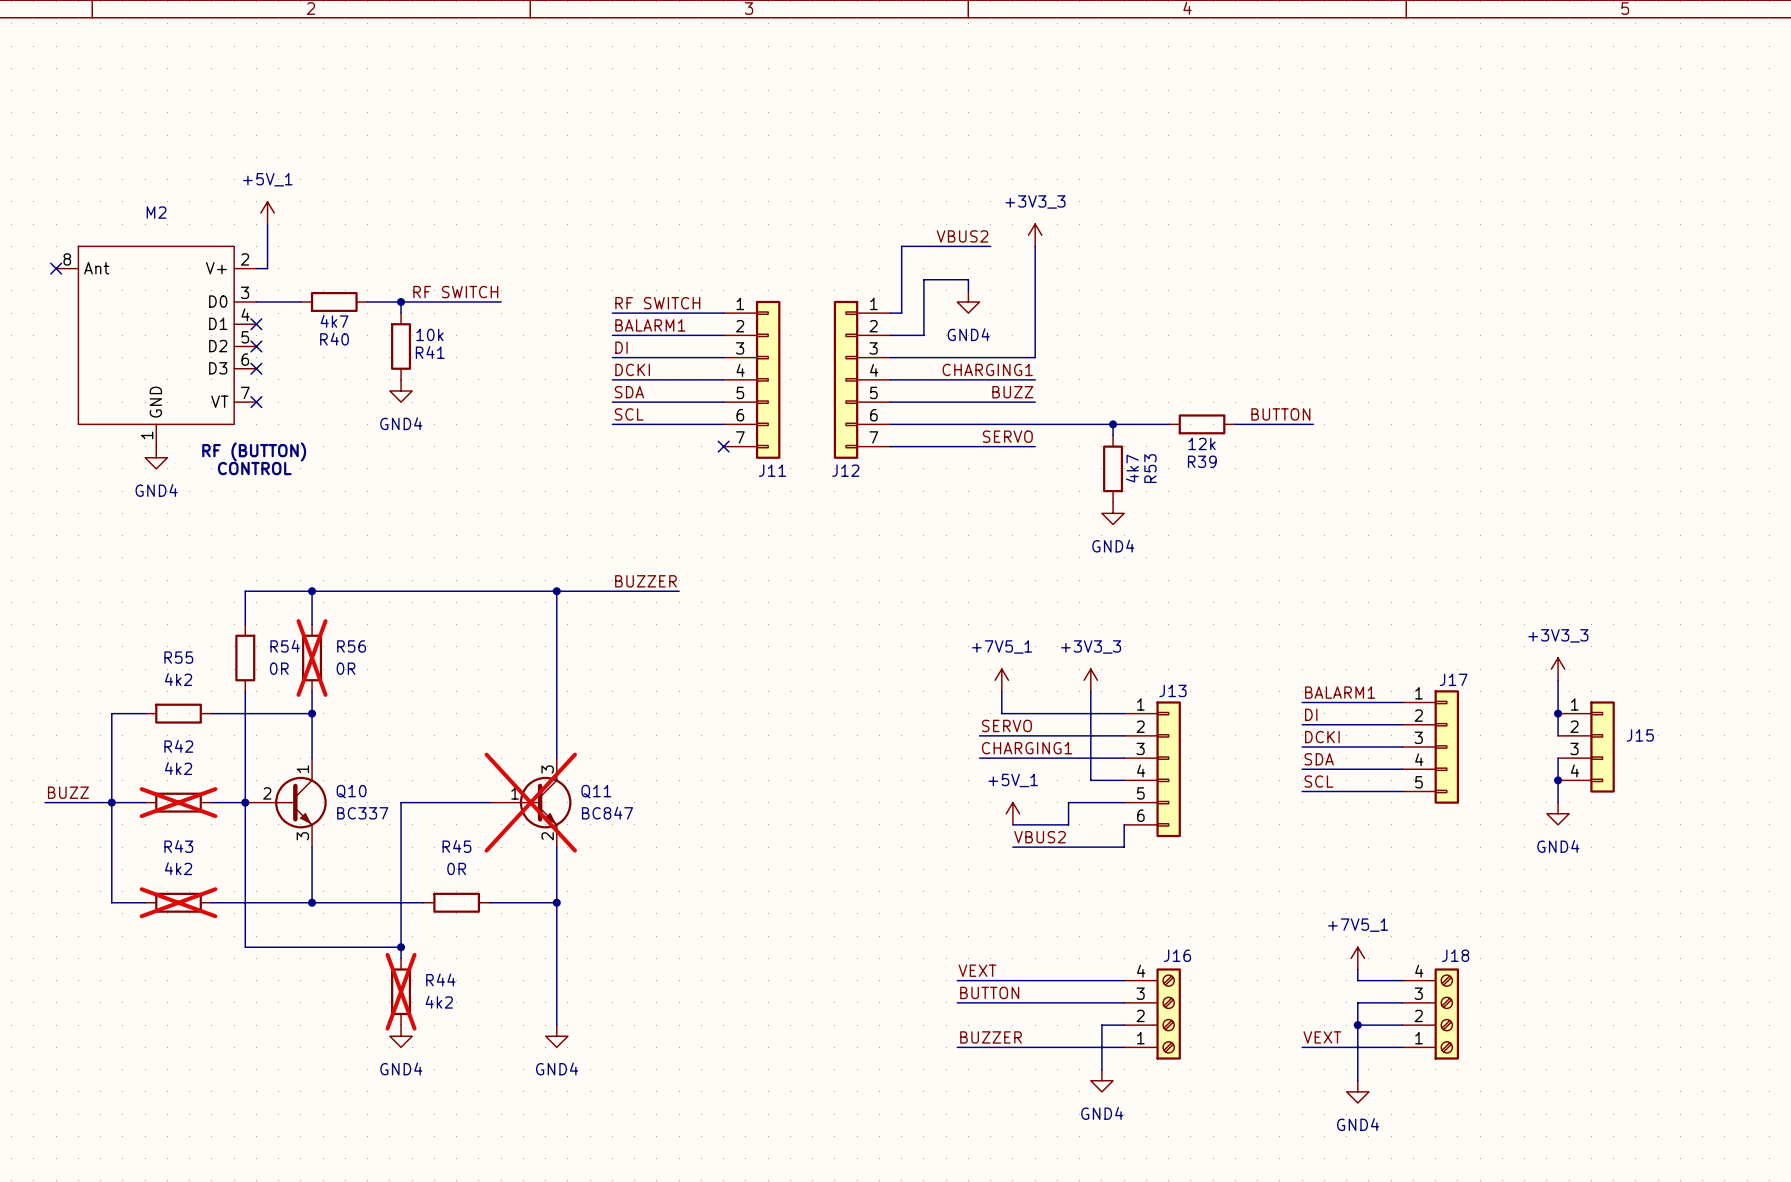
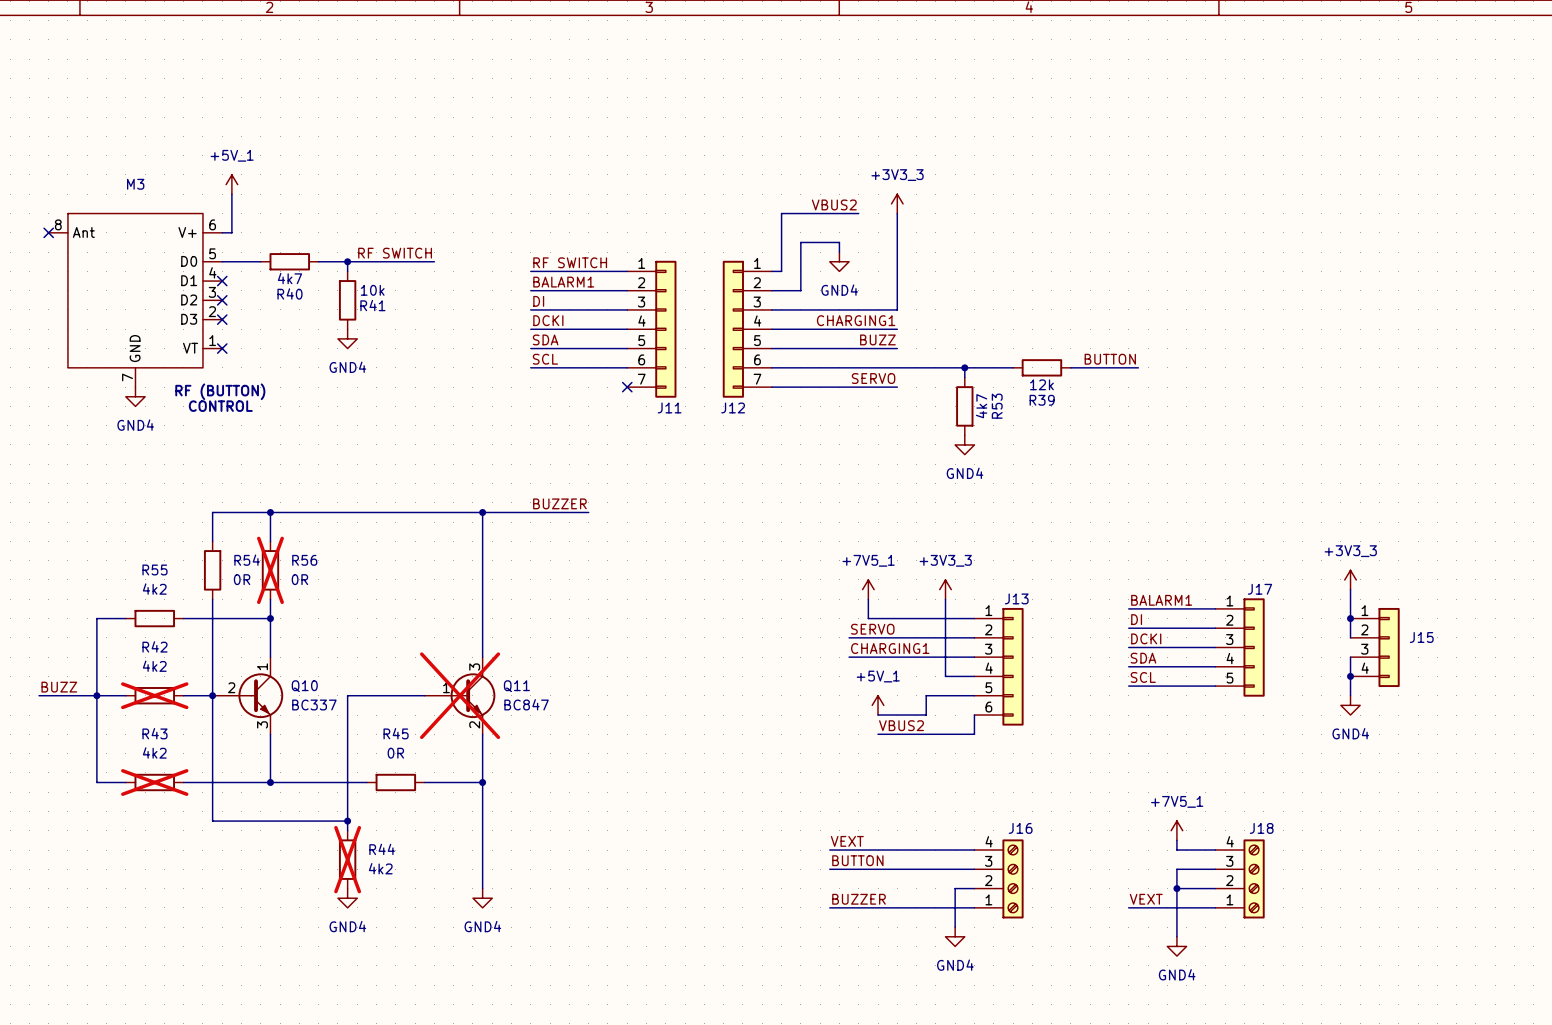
M2 name: M2 (156, 212) -> M3 (135, 184)
M2 pin number: 2 (245, 259) -> 6 (212, 224)
M2 pin number: 3 (245, 292) -> 5 (212, 253)
M2 pin number: 5 (245, 337) -> 3 (212, 292)
M2 pin number: 6 (245, 359) -> 2 (212, 311)
M2 pin number: 7 (245, 392) -> 1 (212, 340)
M2 pin number: 1 (147, 435) -> 7 (127, 377)

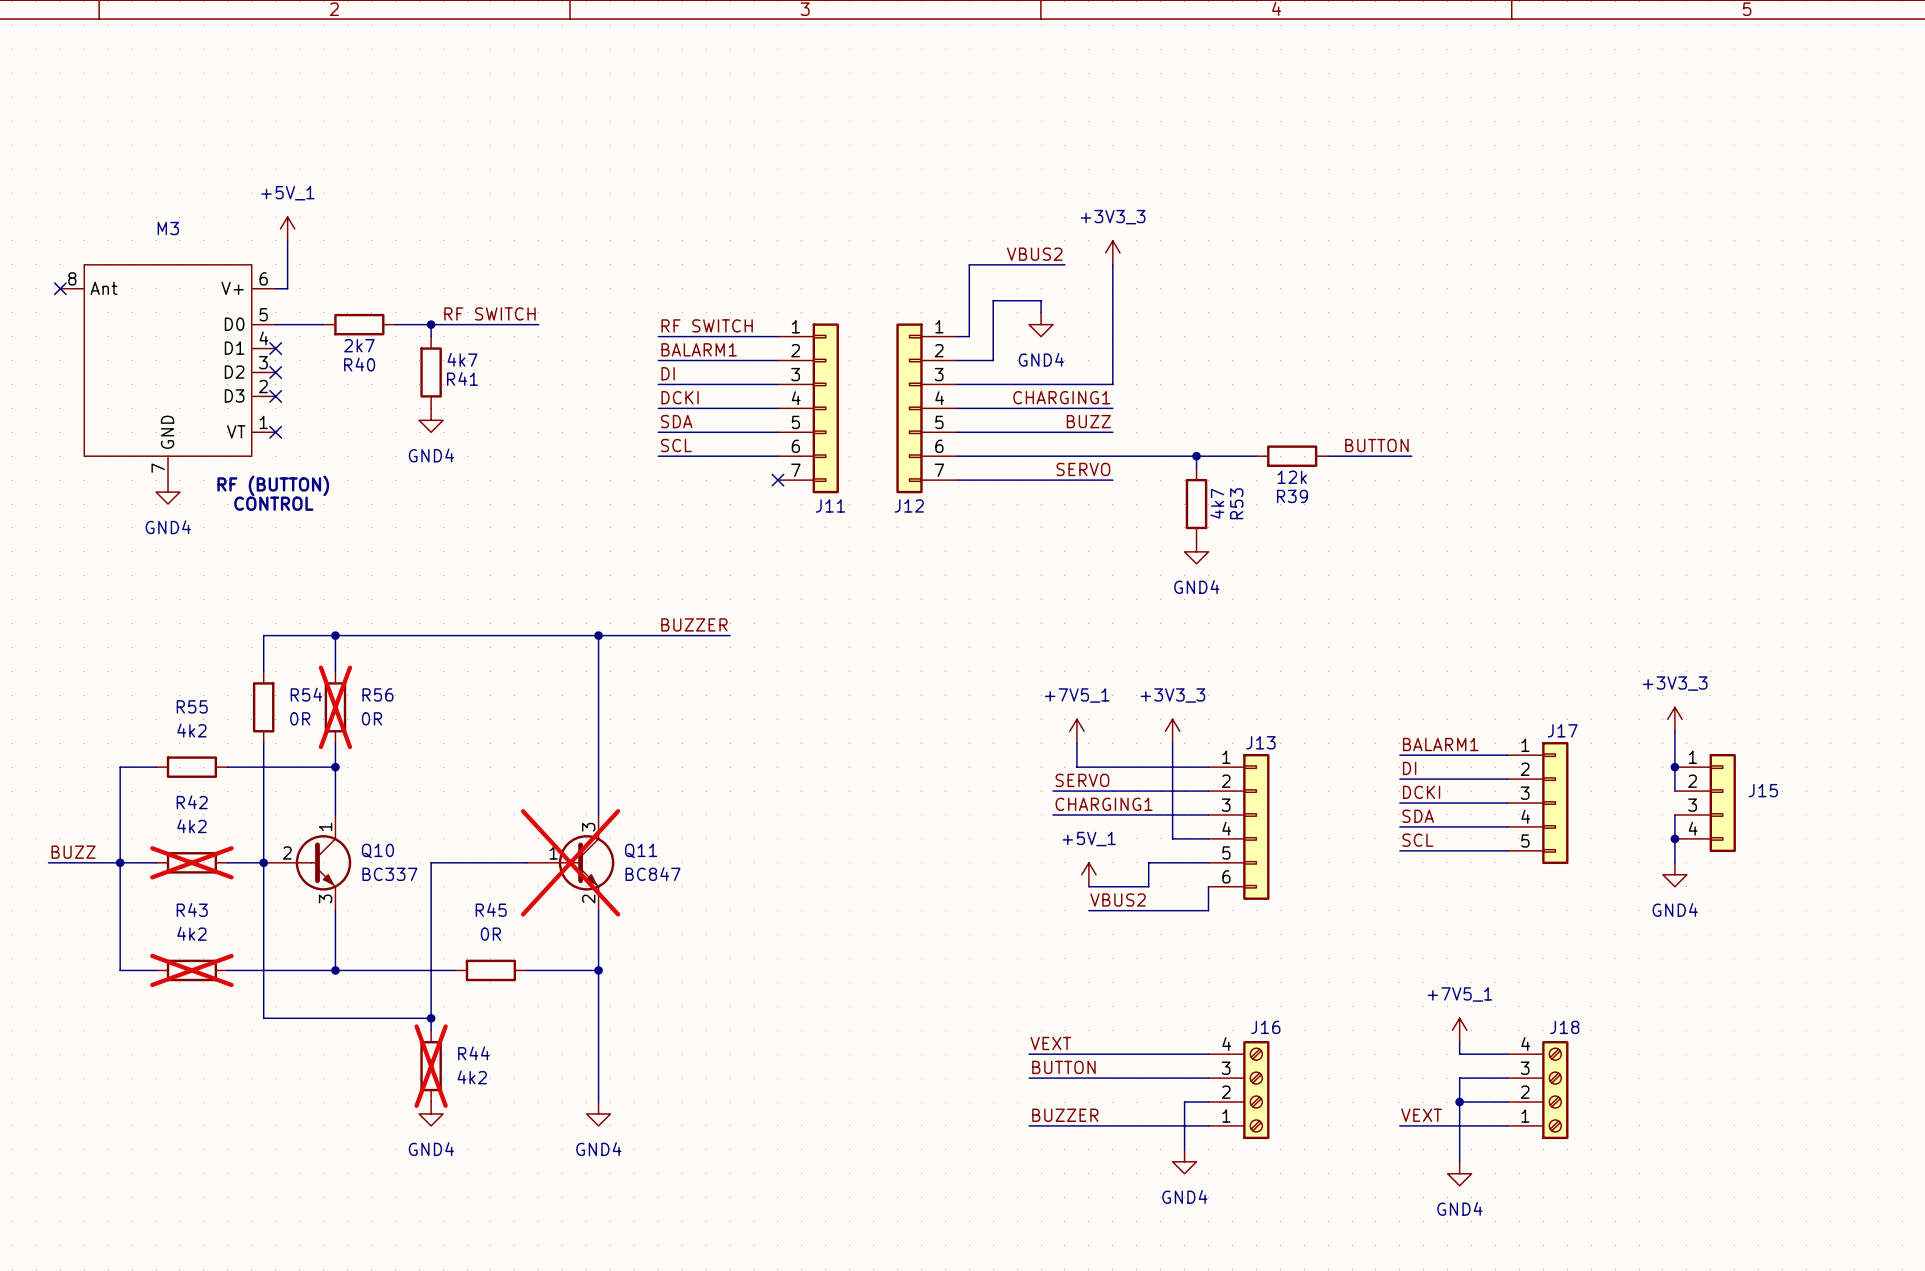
R40 value: 4k7 (289, 278) -> 2k7 (359, 345)
R41 value: 10k (372, 290) -> 4k7 (462, 359)

